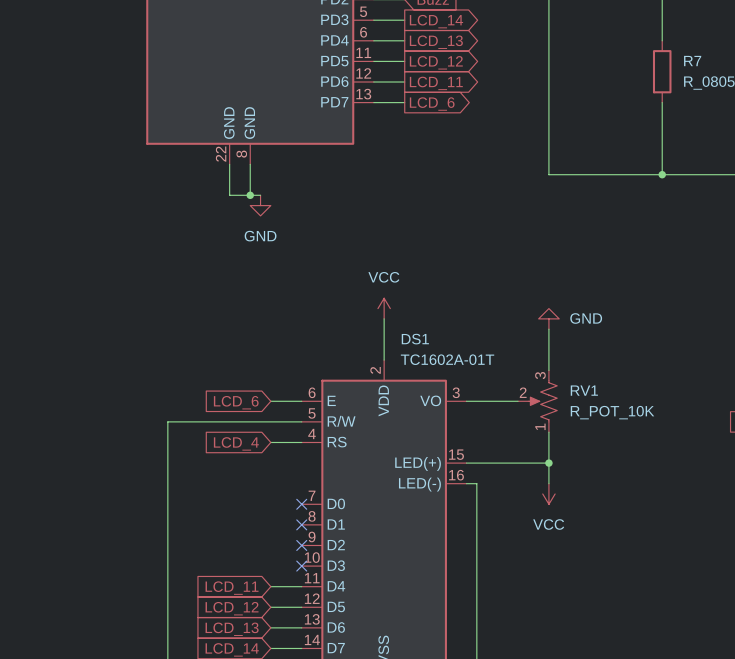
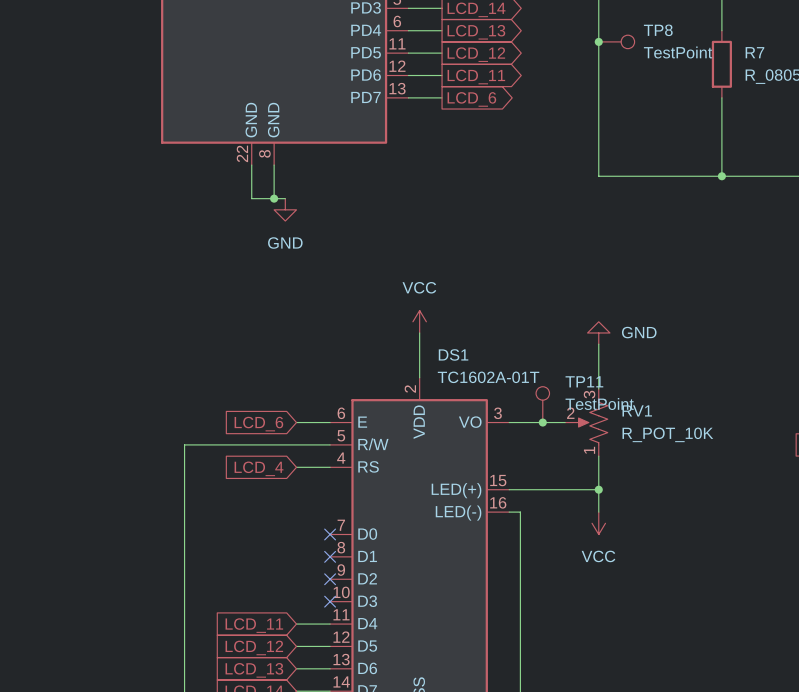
junction: none -> (598, 41)
TP8: none -> TestPoint (616, 41)
TP11: none -> TestPoint (542, 404)
junction: none -> (542, 422)

